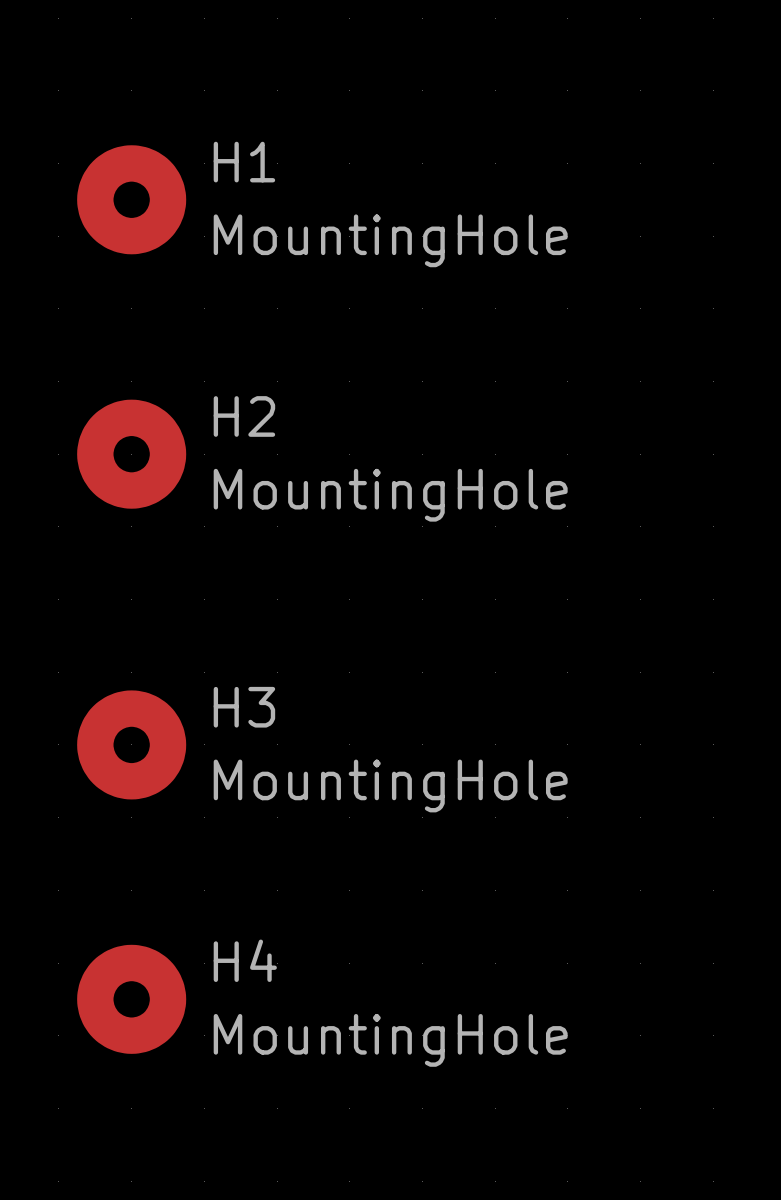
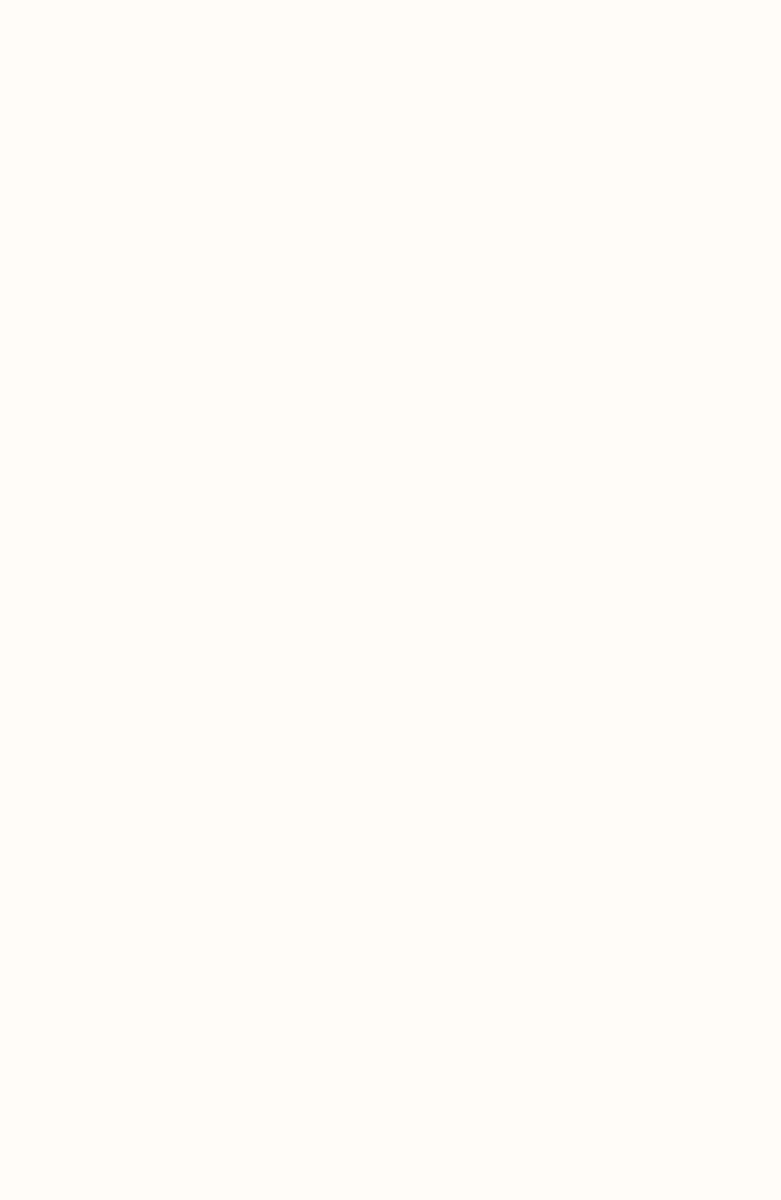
H1: MountingHole (131, 199) -> none
H2: MountingHole (131, 454) -> none
H3: MountingHole (131, 744) -> none
H4: MountingHole (131, 999) -> none

